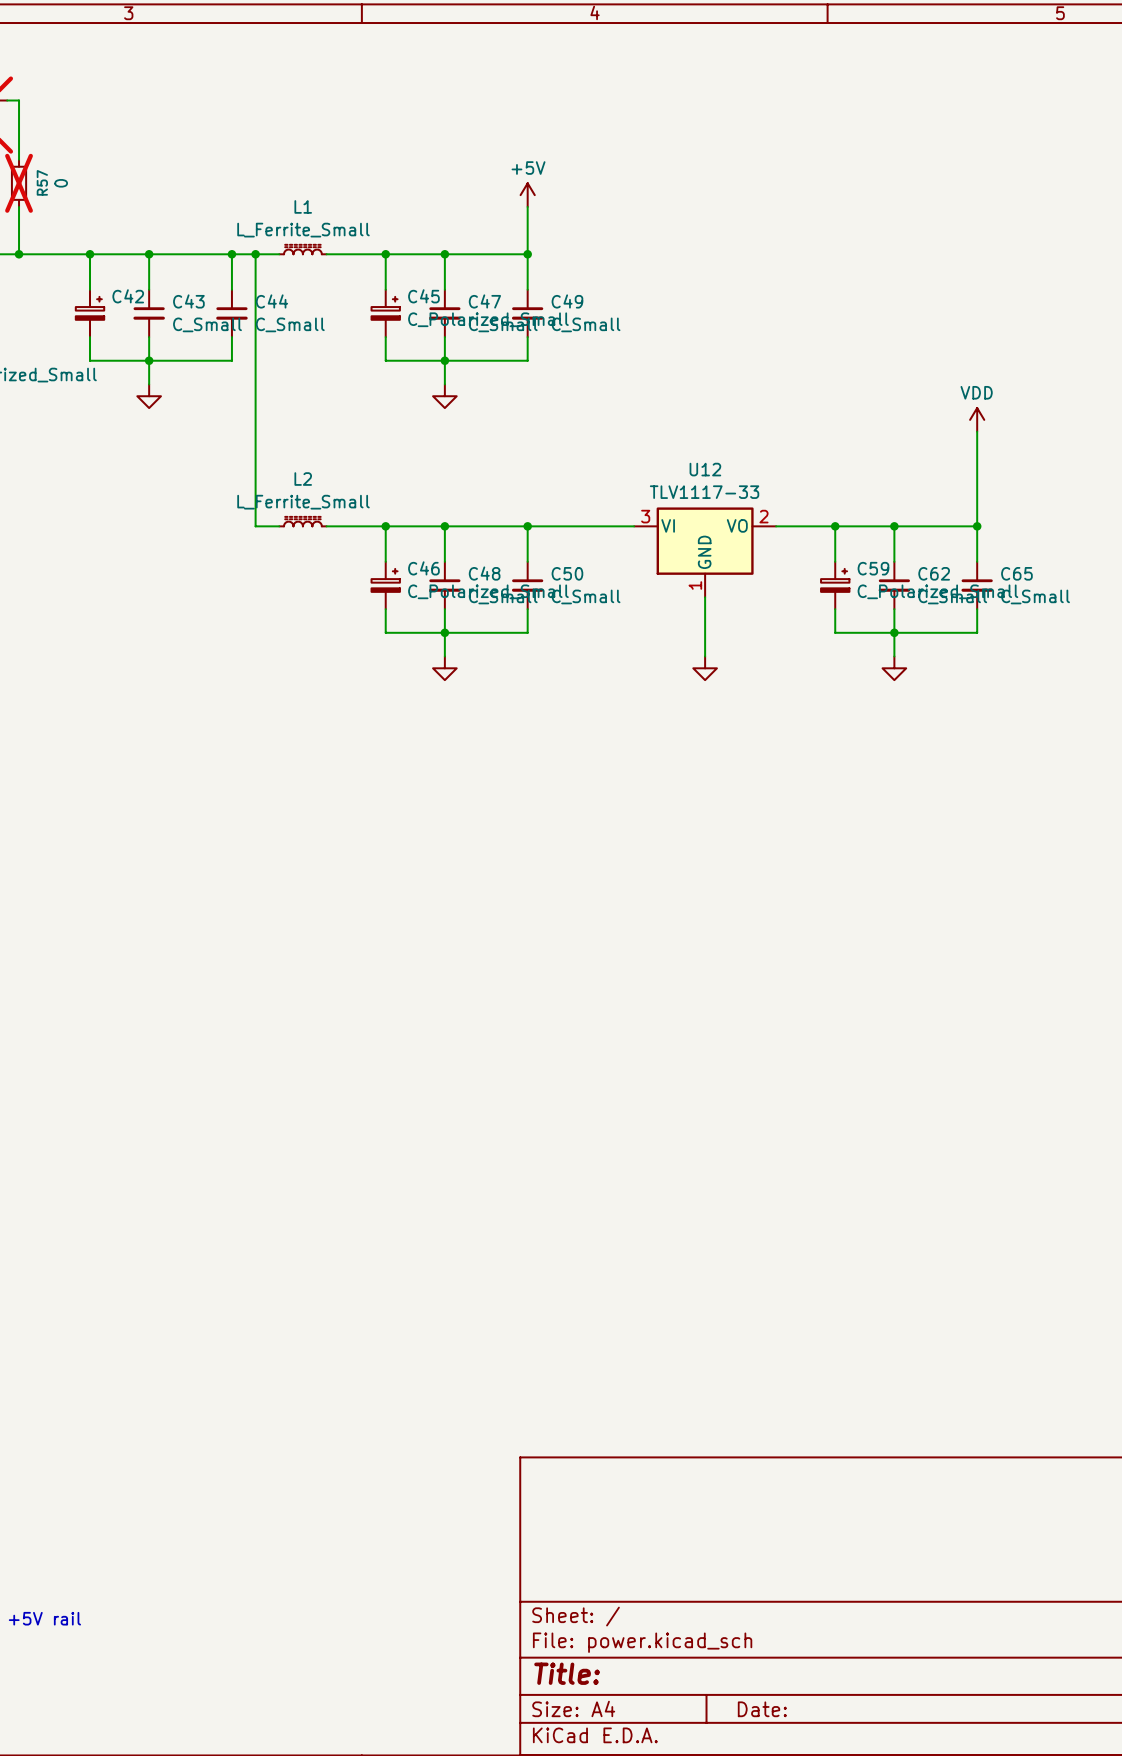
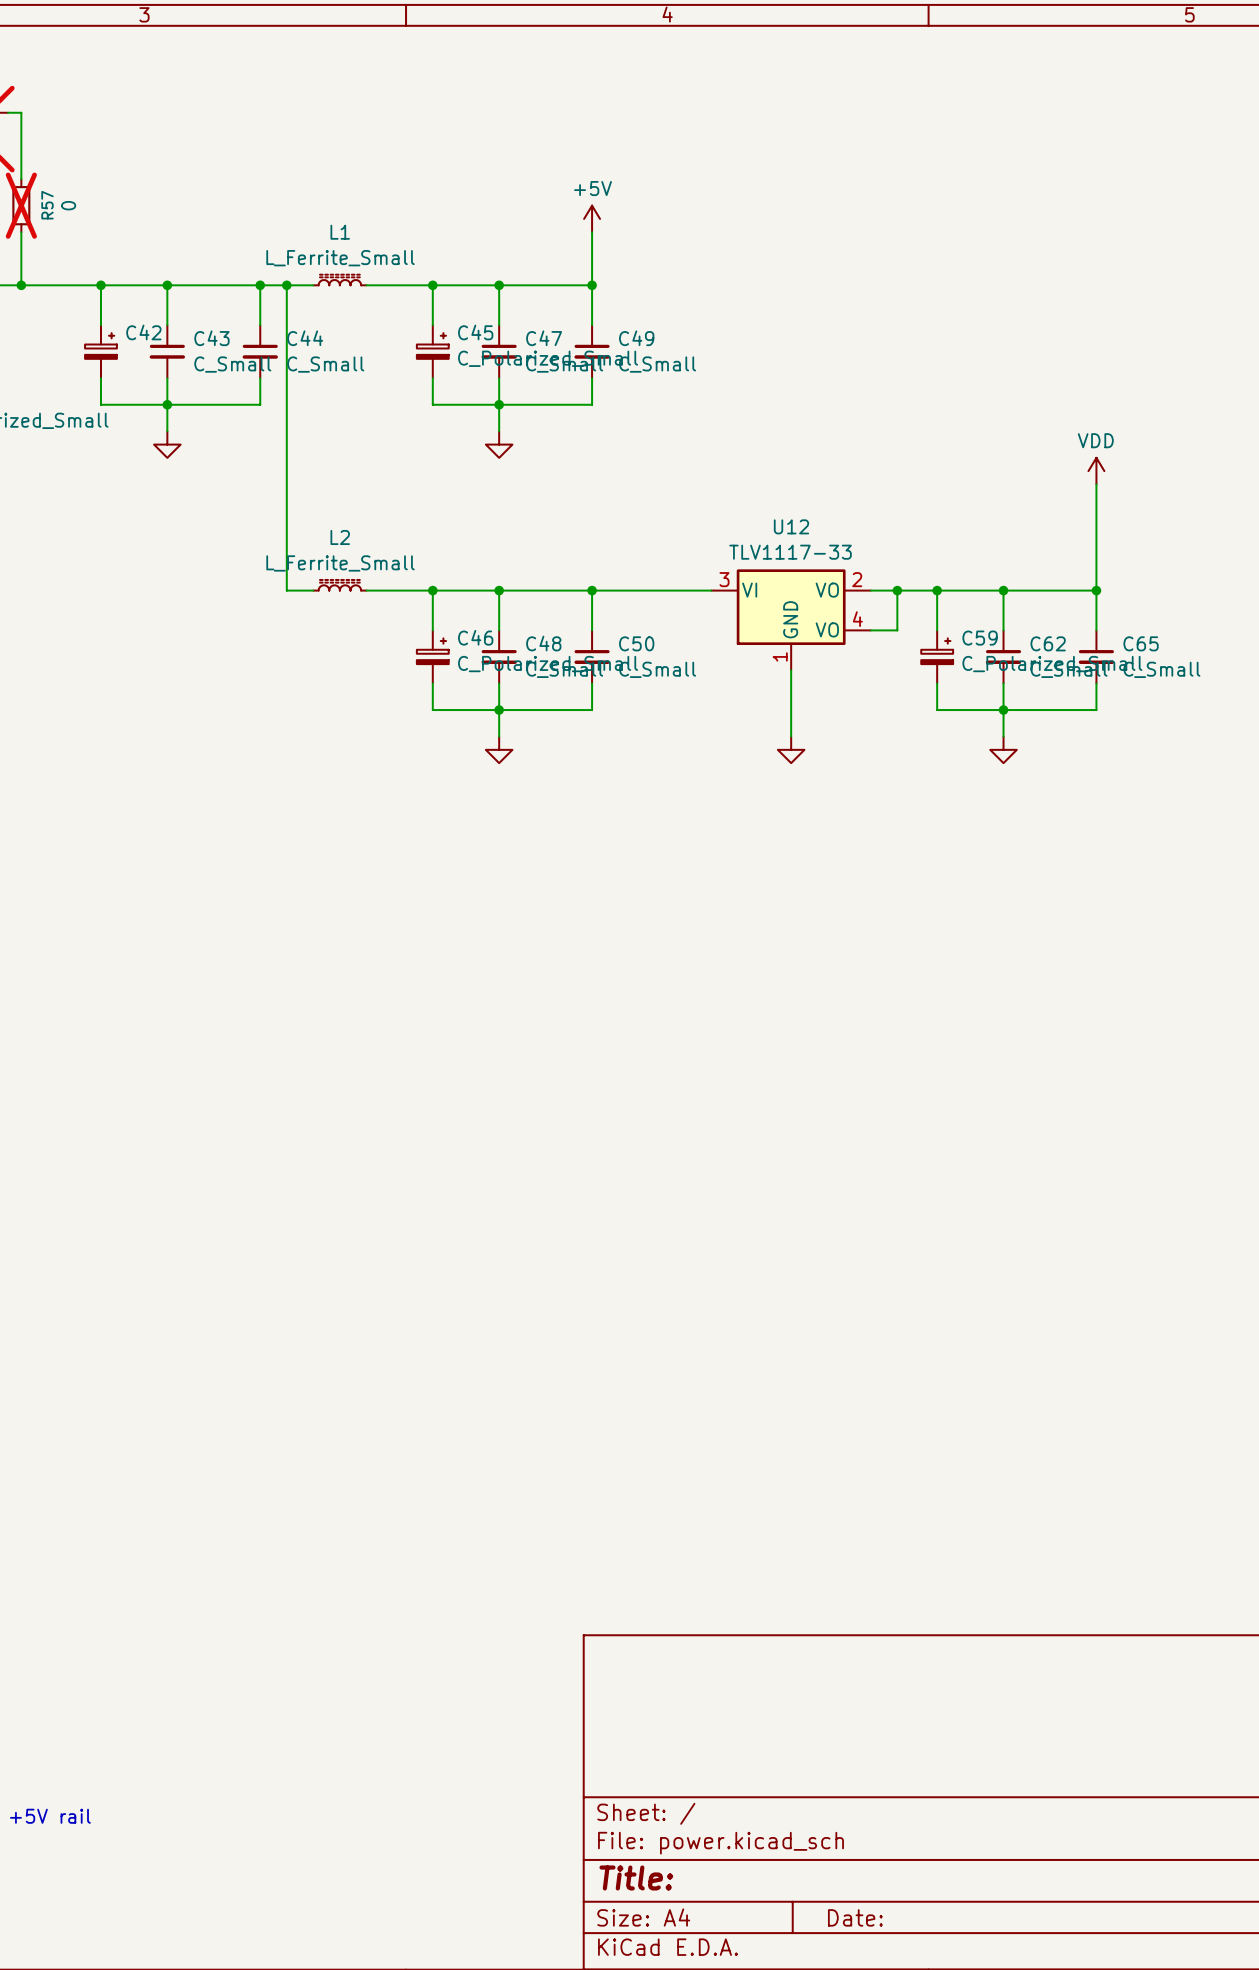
U12 symbol: [634, 507, 777, 598] -> [711, 569, 871, 671]
wire: none -> (897, 590) (897, 630) (870, 630)
junction: none -> (897, 590)

